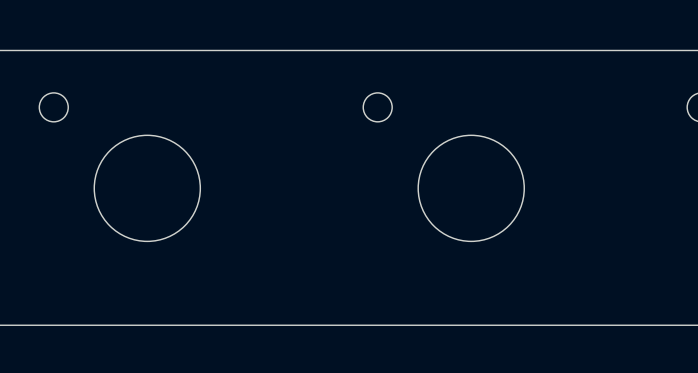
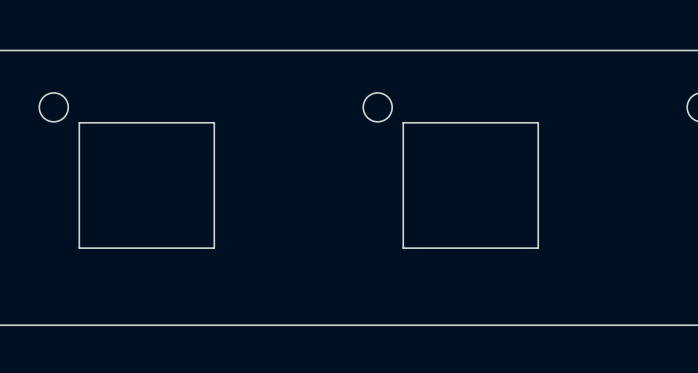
board edge: none -> (79, 122) (214, 122) (214, 248) (79, 248) (79, 122)
board edge: none -> (403, 122) (538, 122) (538, 248) (403, 248) (403, 122)
round board edge: [93, 134, 202, 243] -> none
round board edge: [417, 134, 525, 243] -> none

